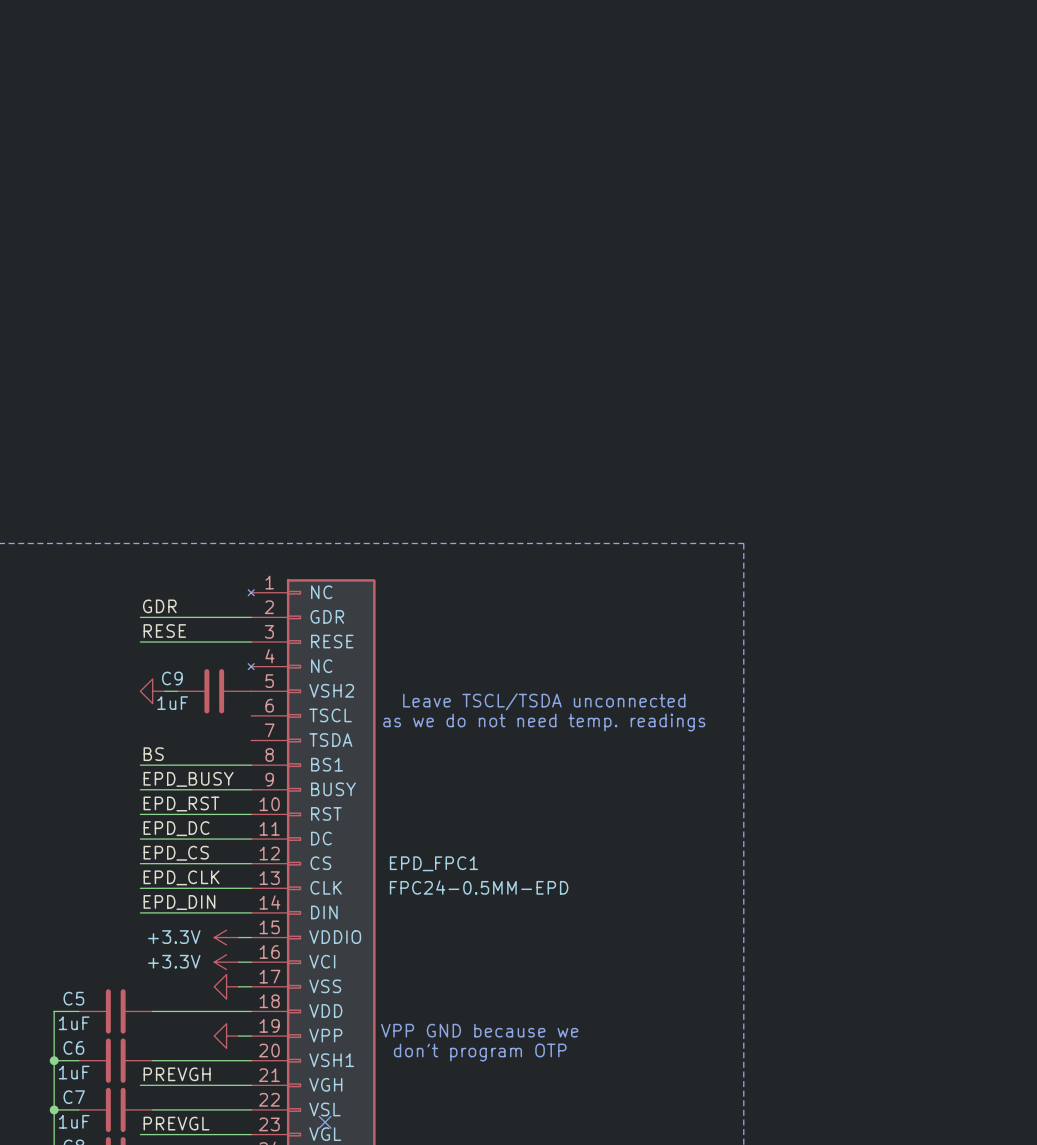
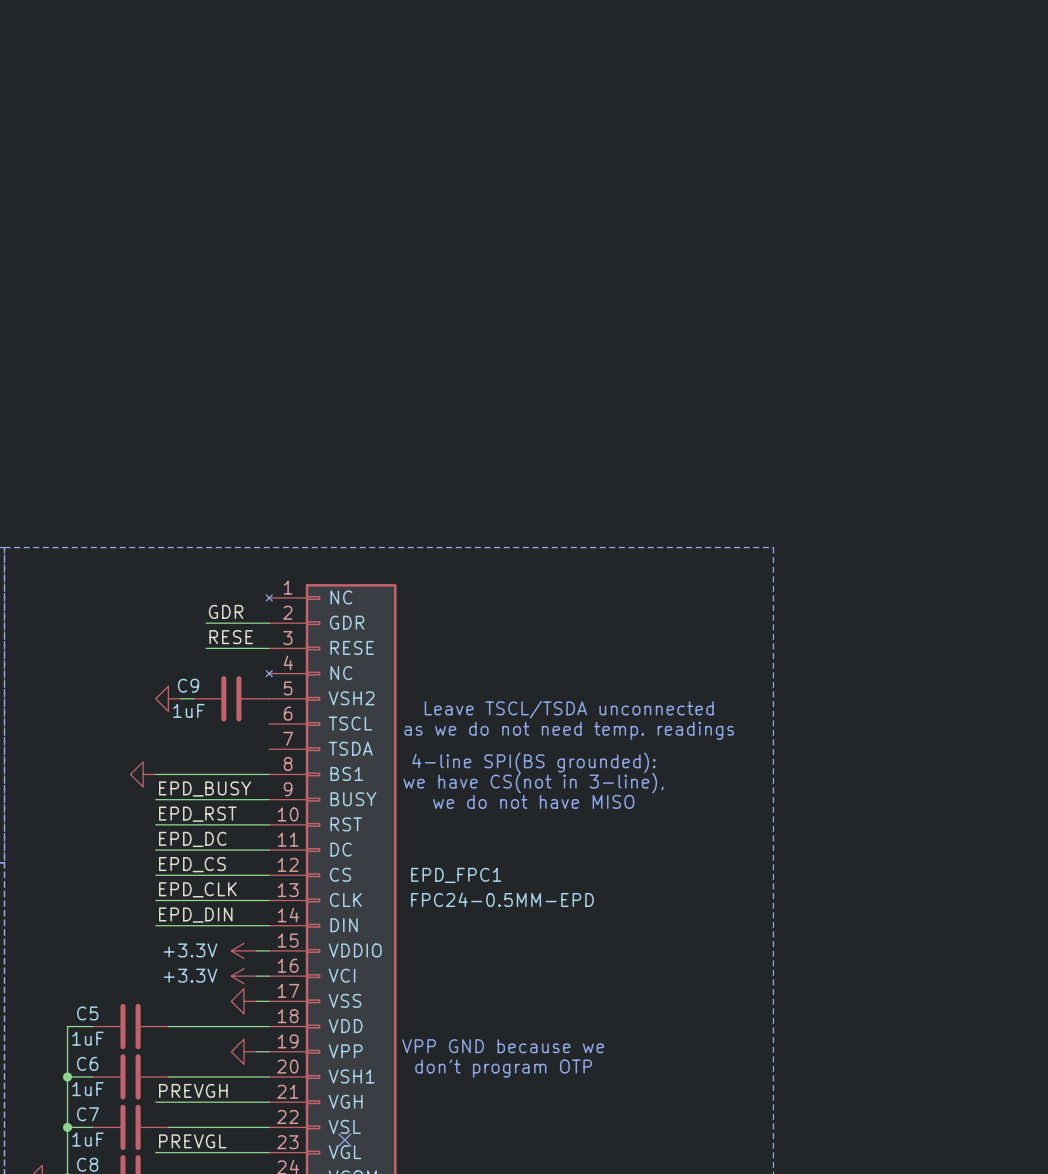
label position: GDR (159, 606) -> GDR (226, 611)
wire: (140, 617) (189, 617) -> none
label position: RESE (164, 631) -> RESE (231, 637)
wire: (140, 642) (189, 642) -> none
text: none -> 4-line SPI(BS grounded): (533, 762)
label: BS (153, 754) -> none
power symbol: none -> (143, 774)
text: none -> we have CS(not in 3-line), (533, 783)
text: none -> we do not have MISO (533, 801)

